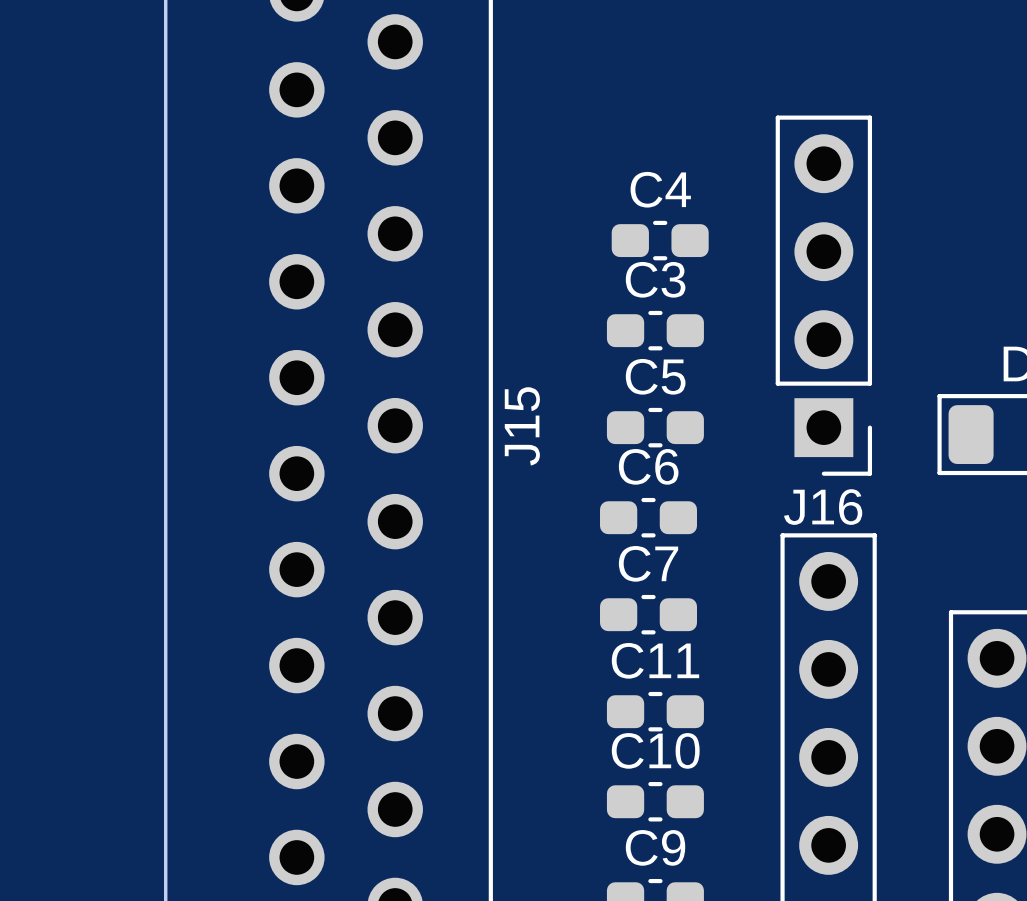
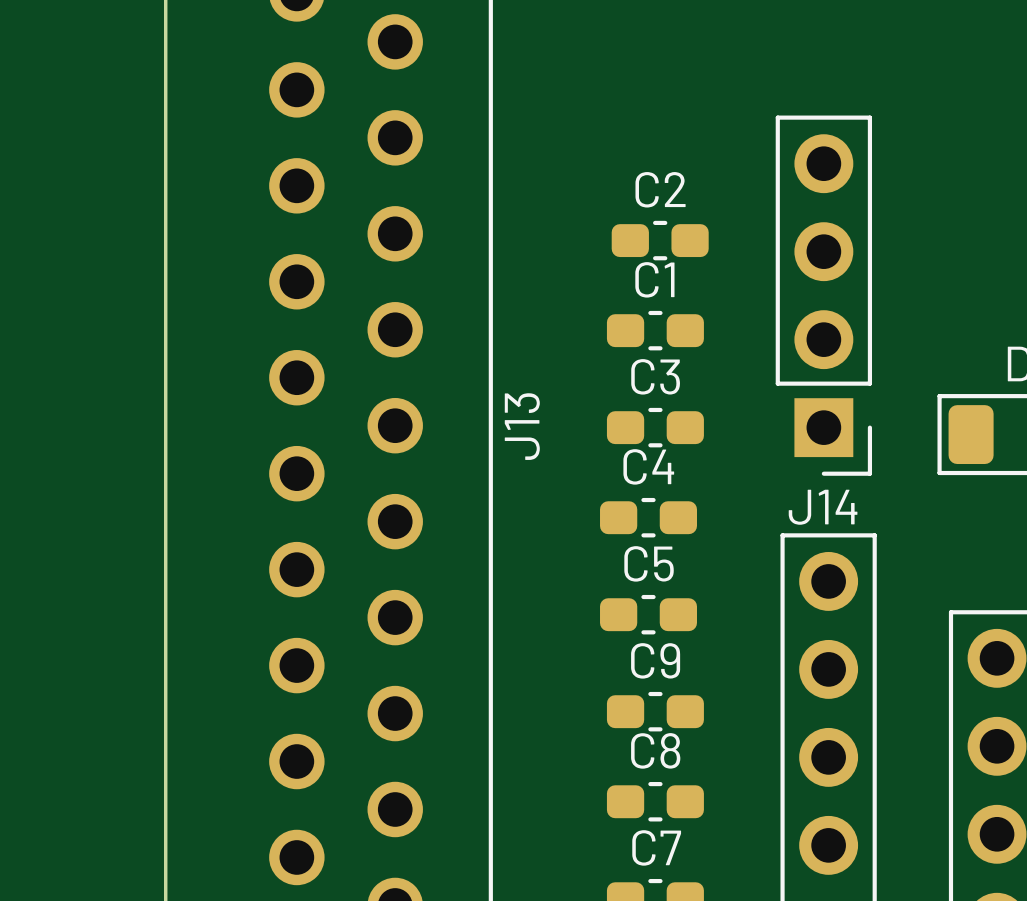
C4 name: C4 (660, 189) -> C2 (660, 189)
C3 name: C3 (655, 279) -> C1 (654, 279)
C5 name: C5 (655, 376) -> C3 (655, 376)
J15 name: J15 (522, 426) -> J13 (522, 426)
C6 name: C6 (648, 466) -> C4 (648, 466)
J16 name: J16 (823, 507) -> J14 (823, 507)
C7 name: C7 (648, 563) -> C5 (649, 563)
C11 name: C11 (655, 660) -> C9 (655, 660)
C10 name: C10 (655, 750) -> C8 (655, 750)
C9 name: C9 (655, 847) -> C7 (656, 847)

